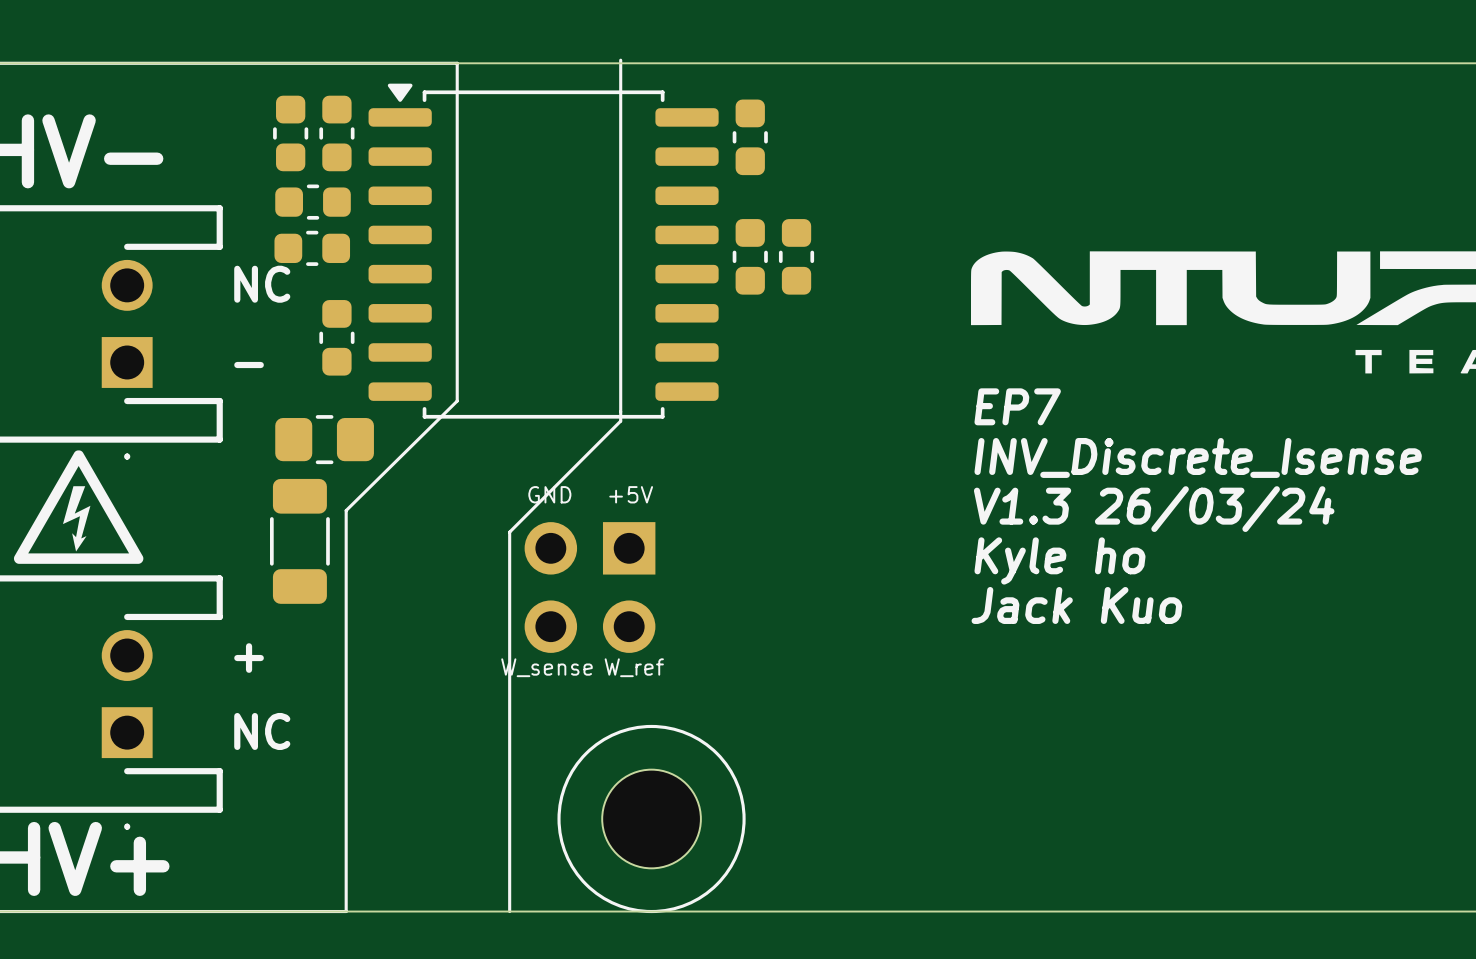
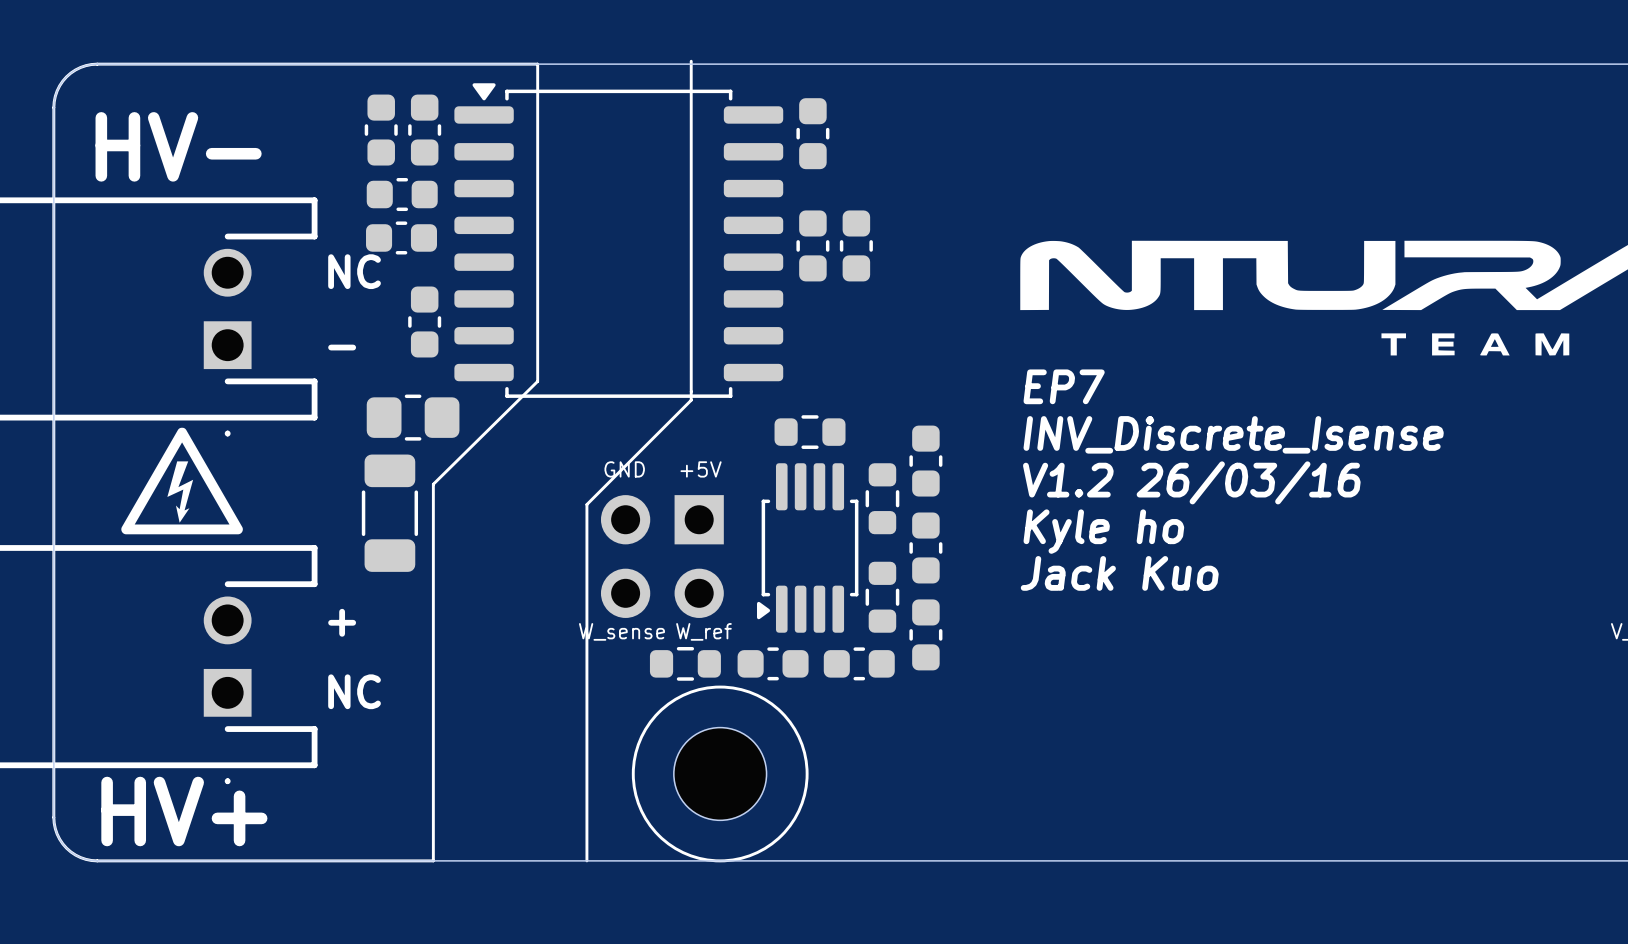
part: none -> (810, 432)
part: none -> (925, 461)
text: V1.3 26/03/24 (1154, 509) -> V1.2 26/03/16 (1191, 482)
part: none -> (882, 498)
part: none -> (807, 547)
part: none -> (925, 547)
part: none -> (882, 597)
part: none -> (925, 634)
part: none -> (685, 663)
part: none -> (773, 663)
part: none -> (859, 663)

